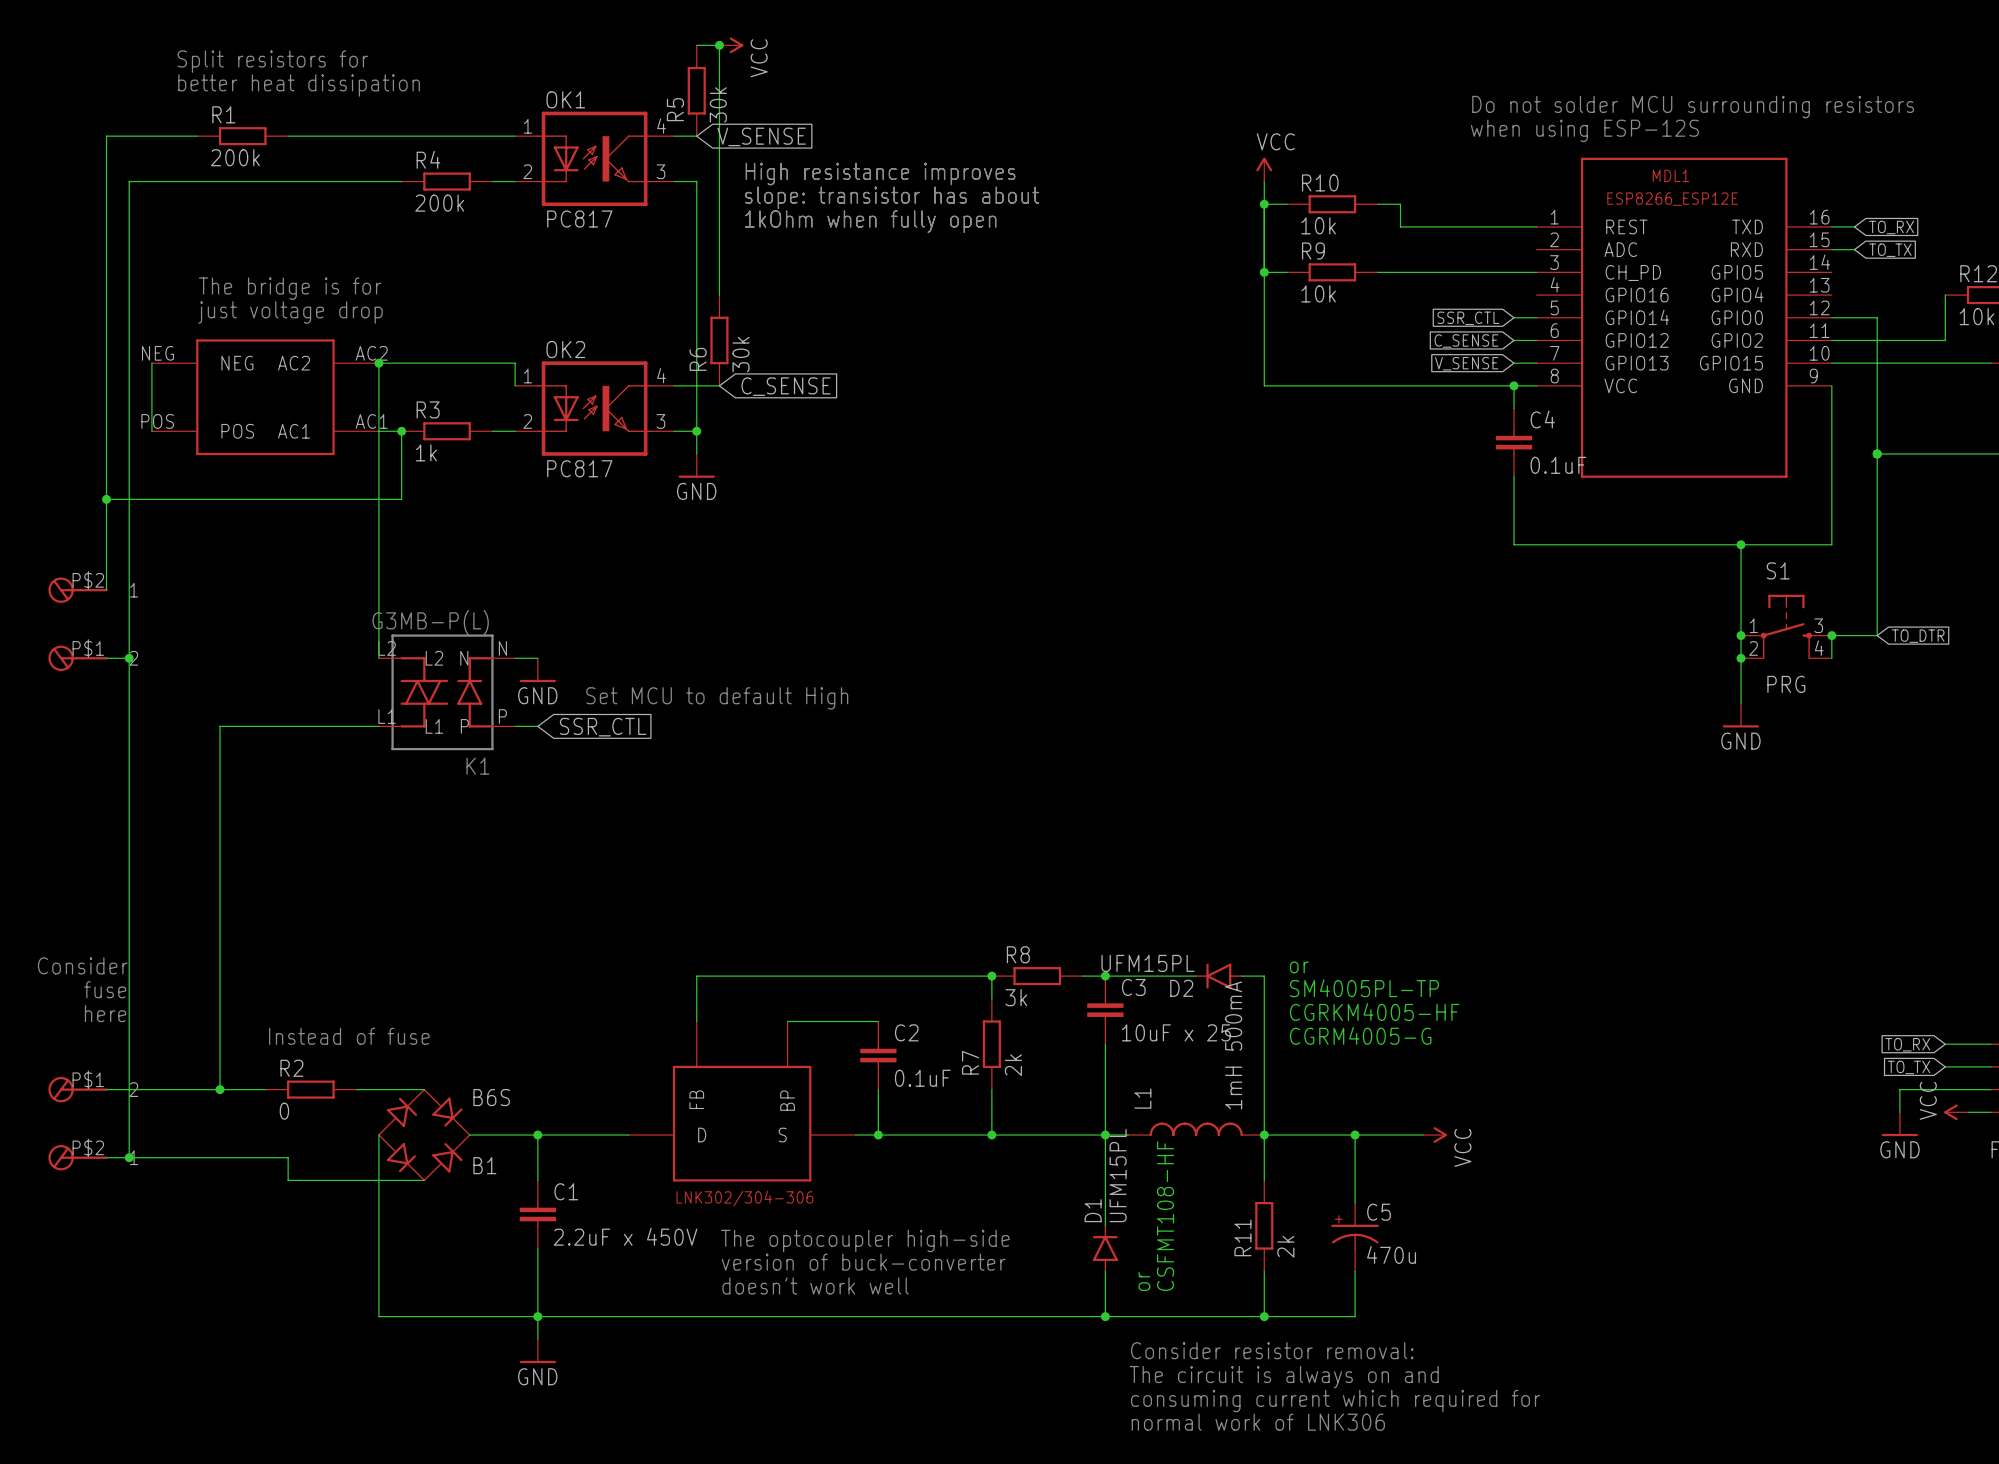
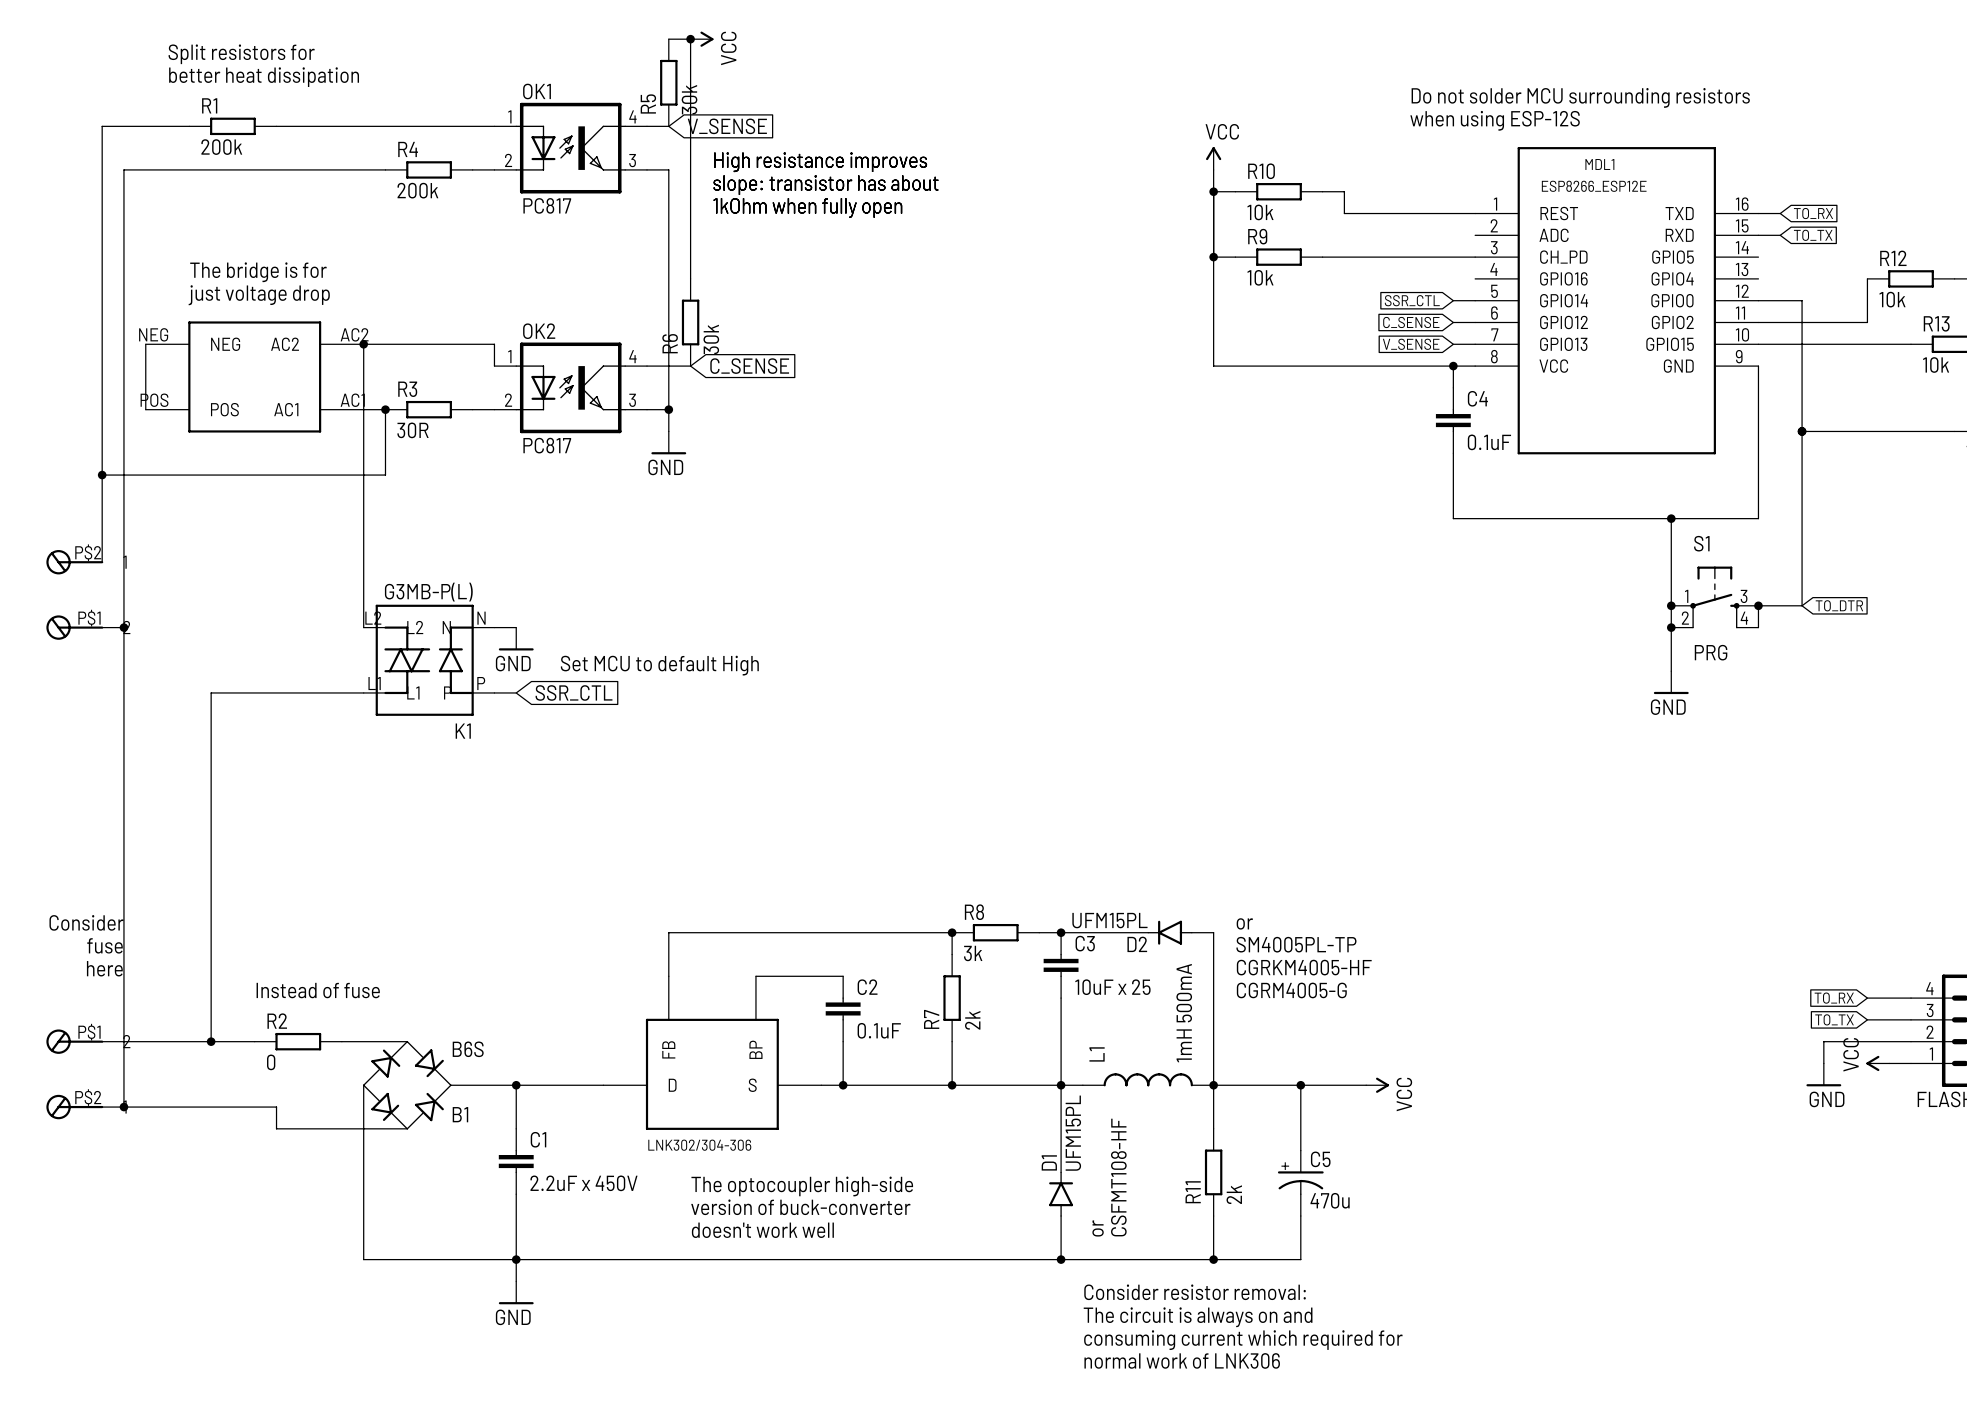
R3 value: 1k (426, 452) -> 30R (412, 430)

